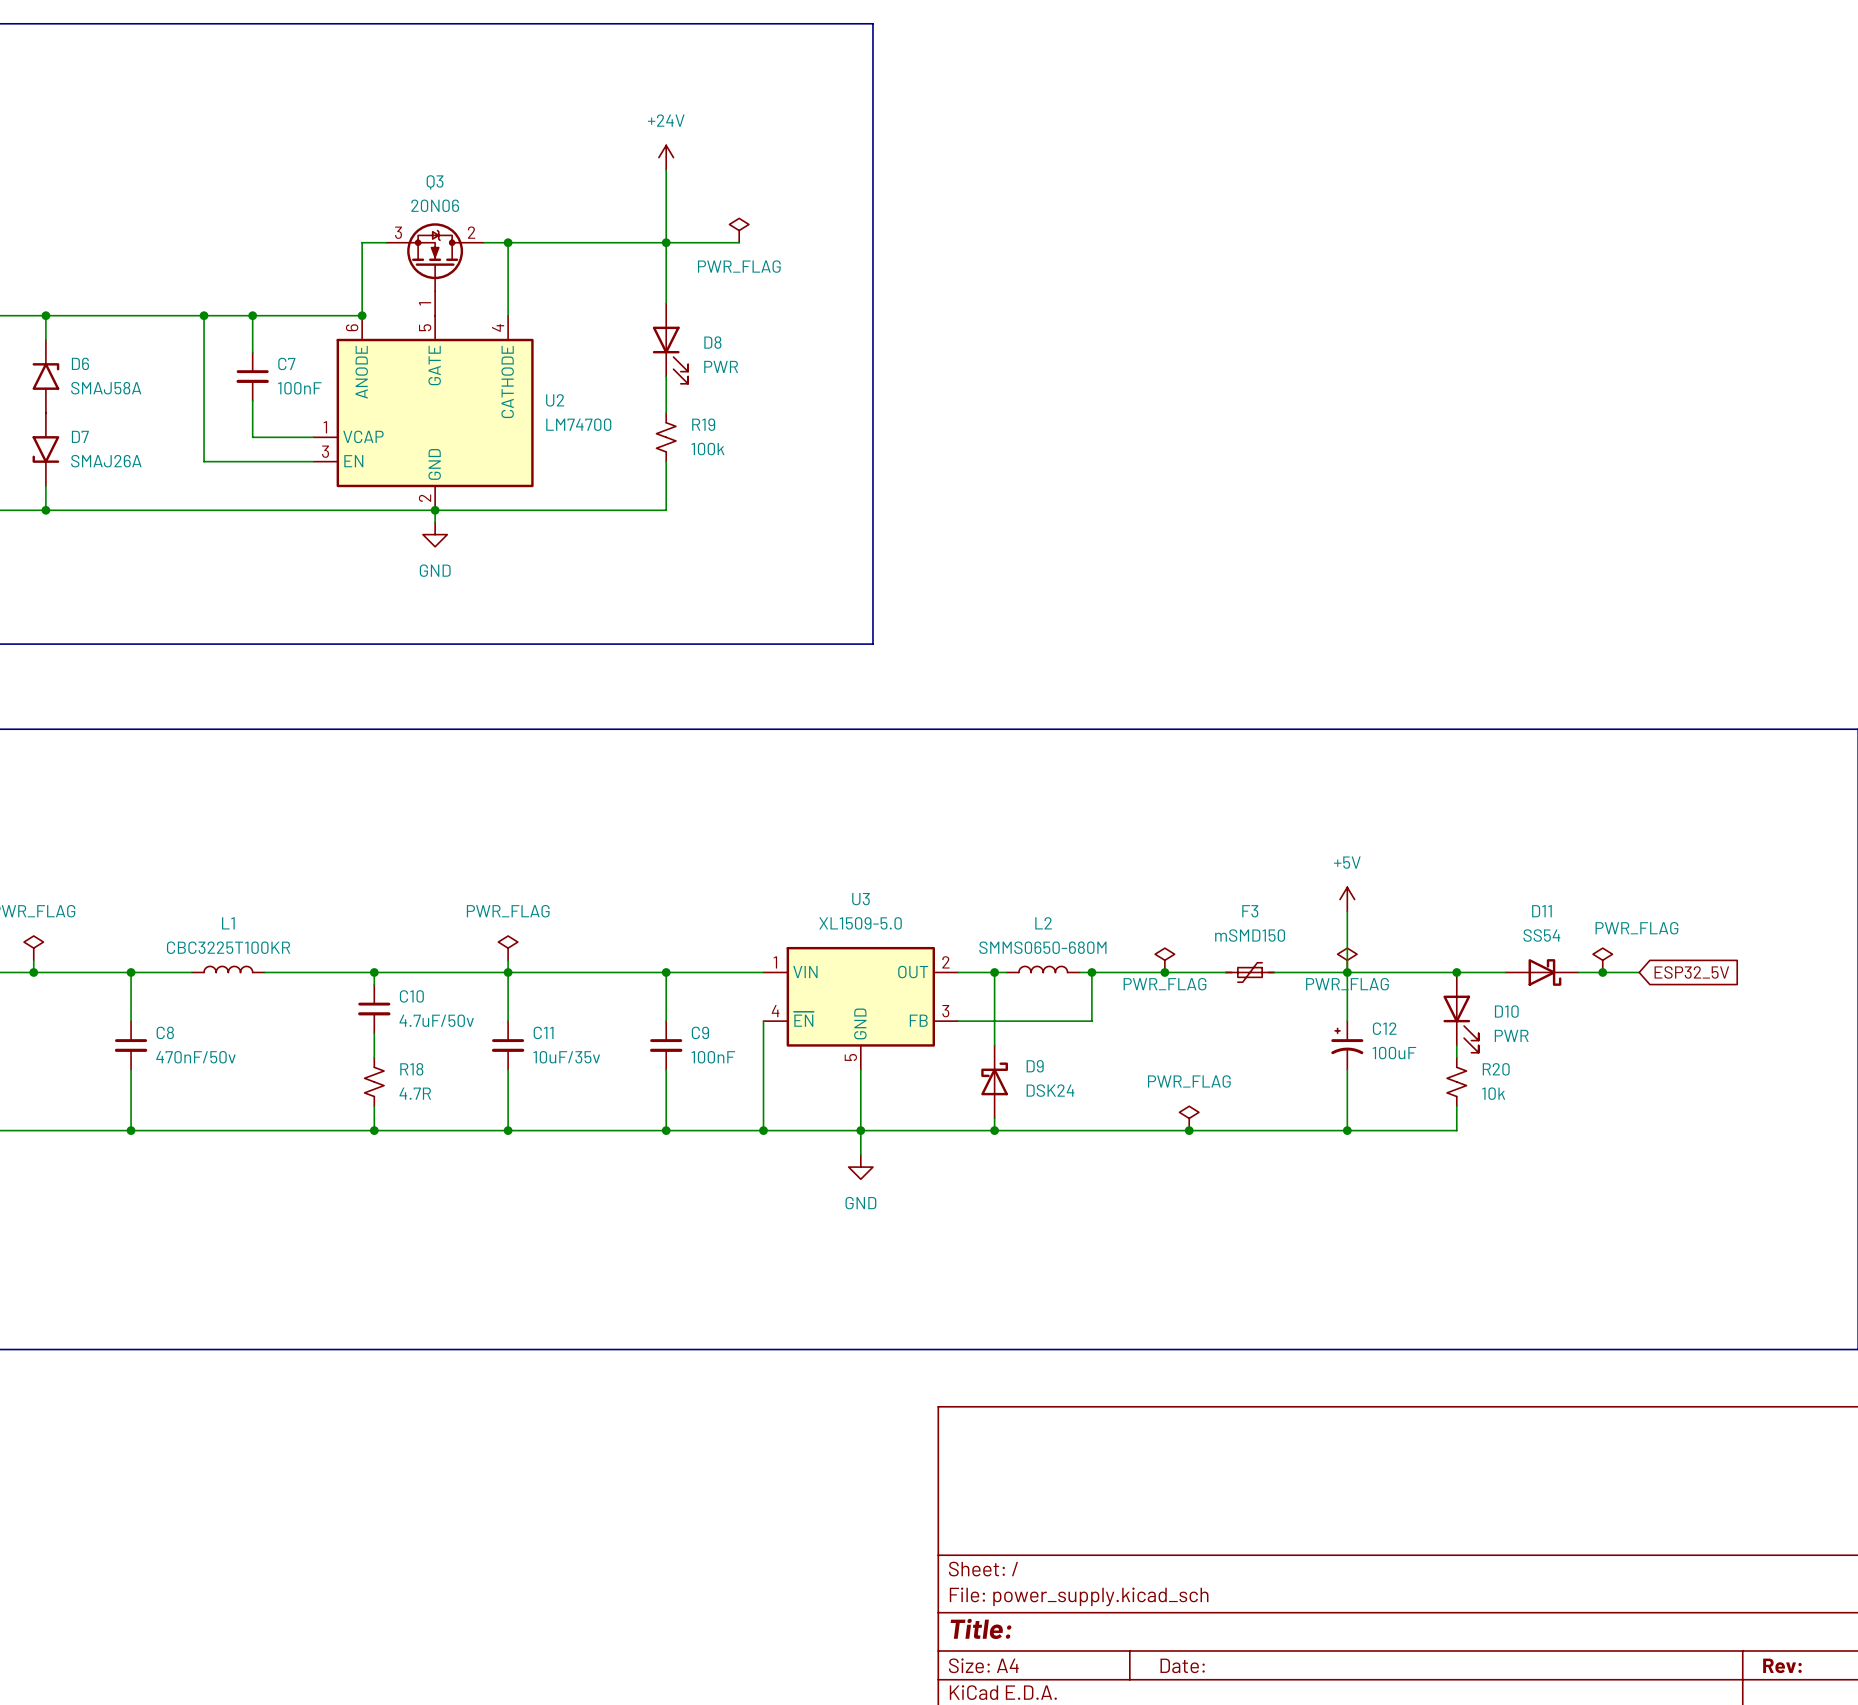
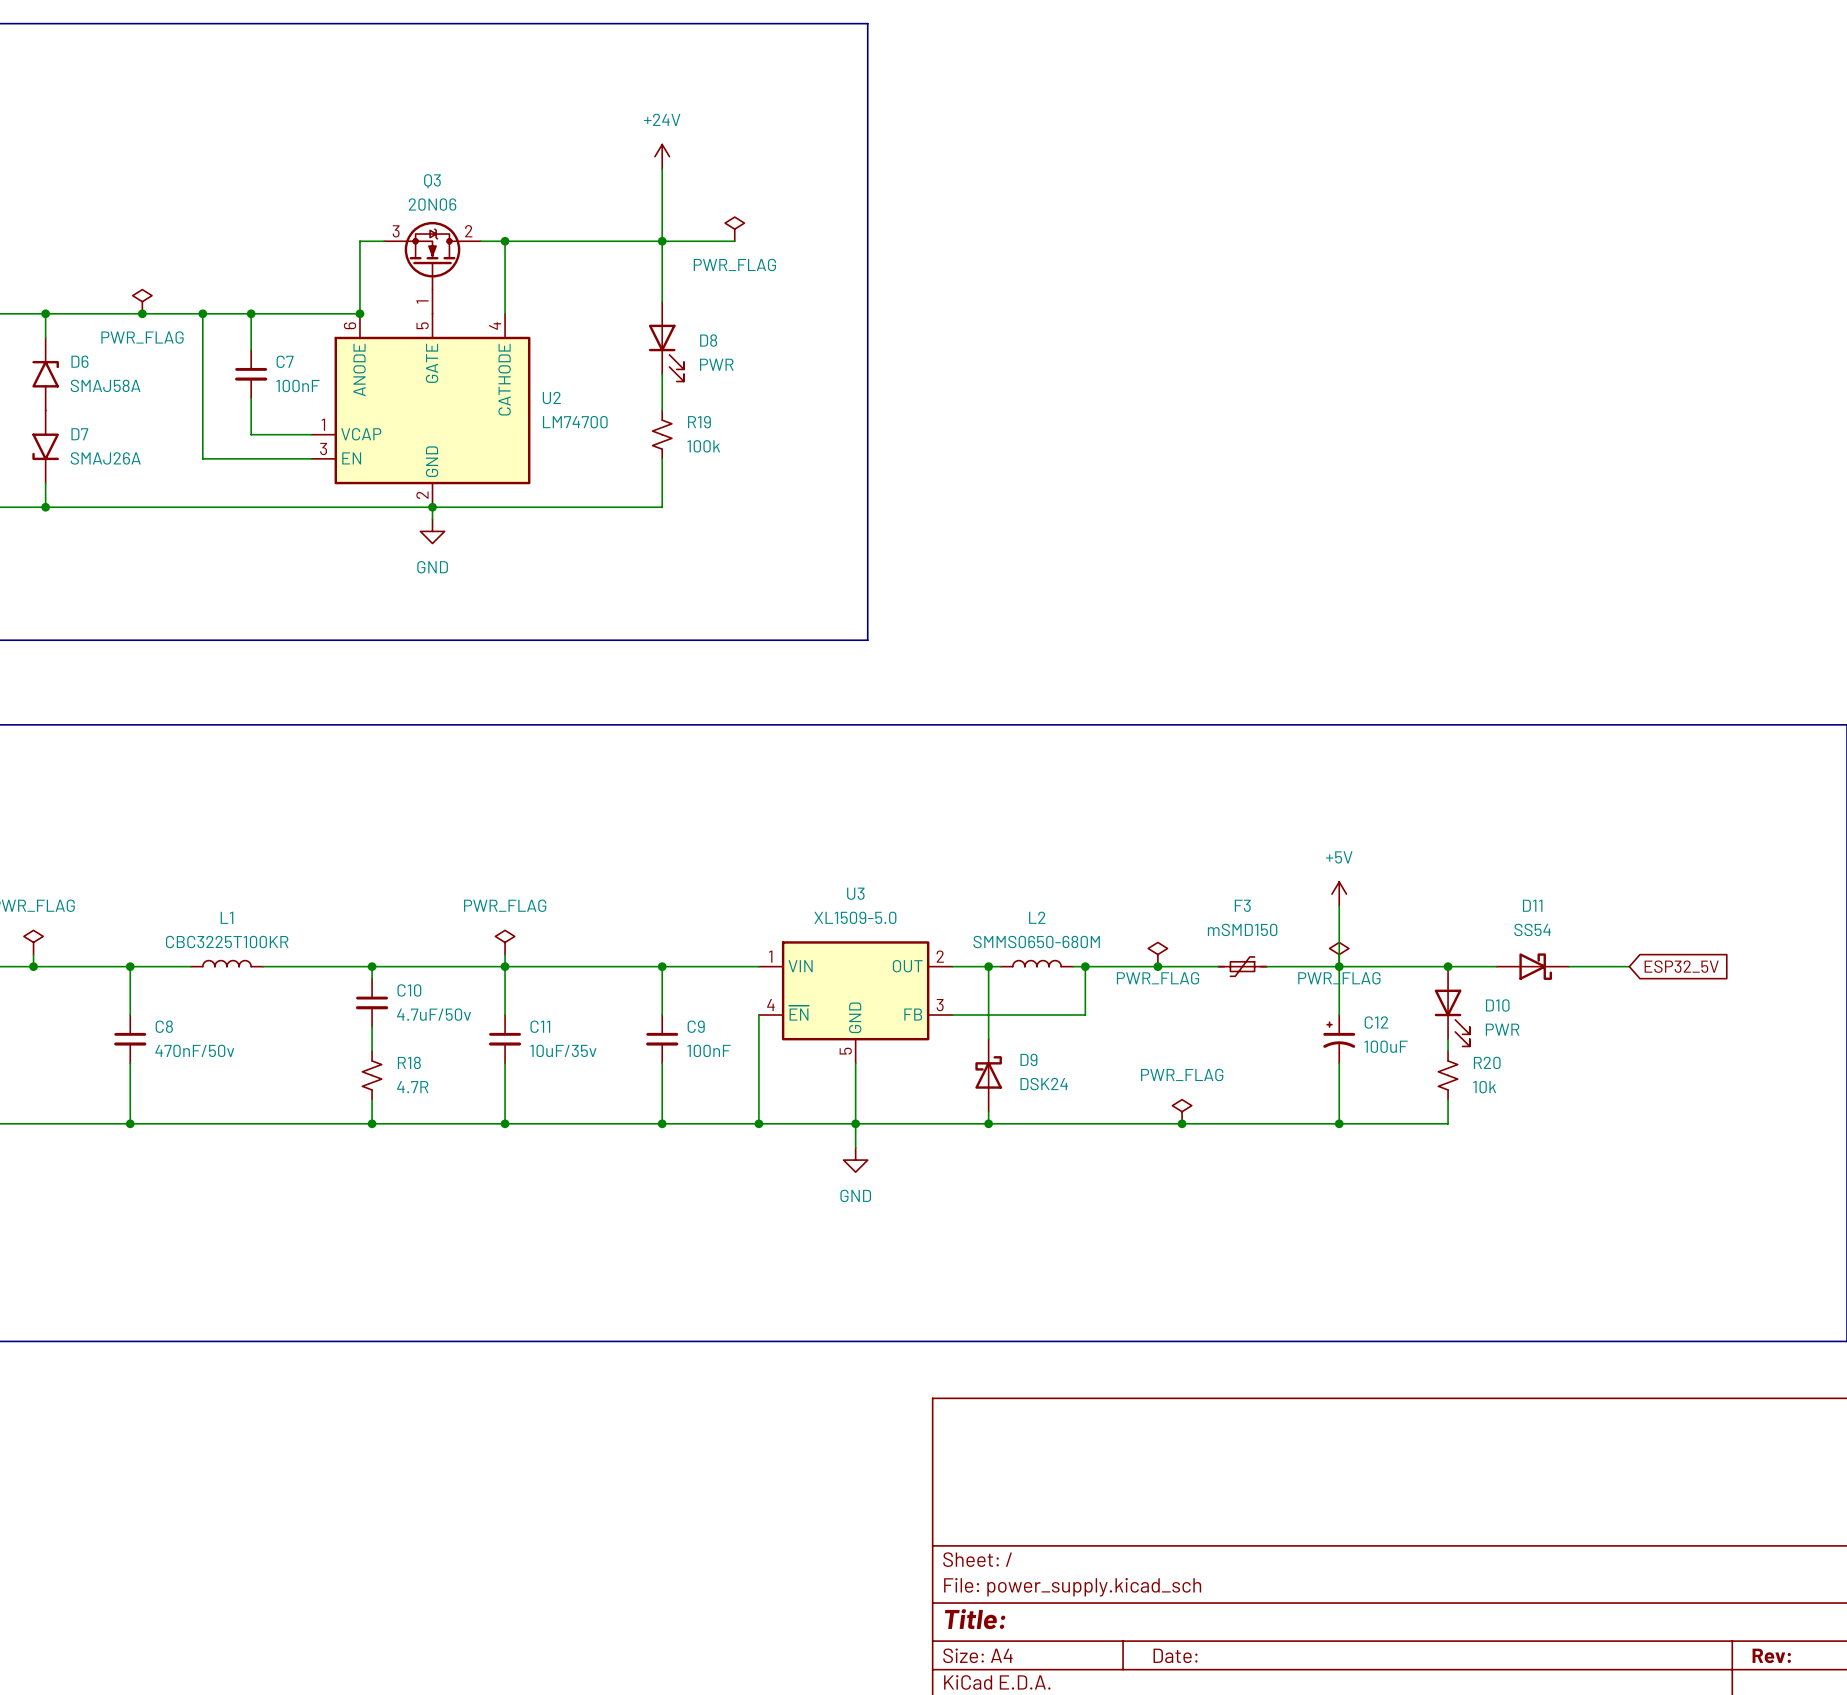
power symbol: none -> PWR_FLAG (142, 301)
junction: none -> (142, 313)
power symbol: PWR_FLAG (1602, 960) -> none
junction: (1602, 972) -> none

